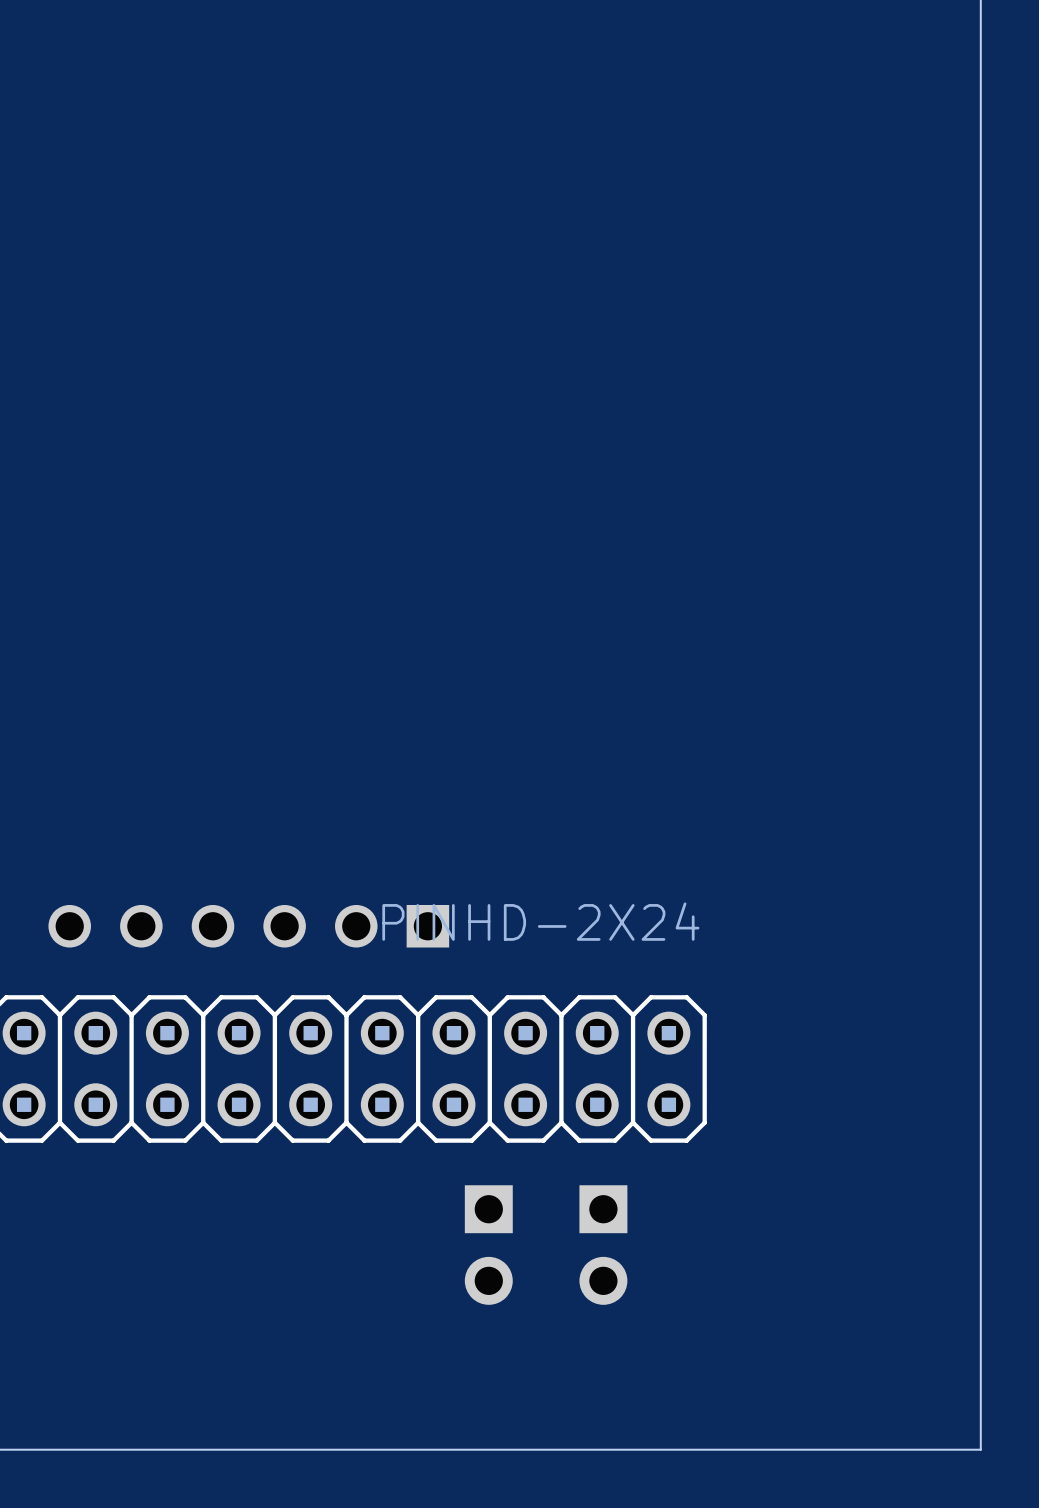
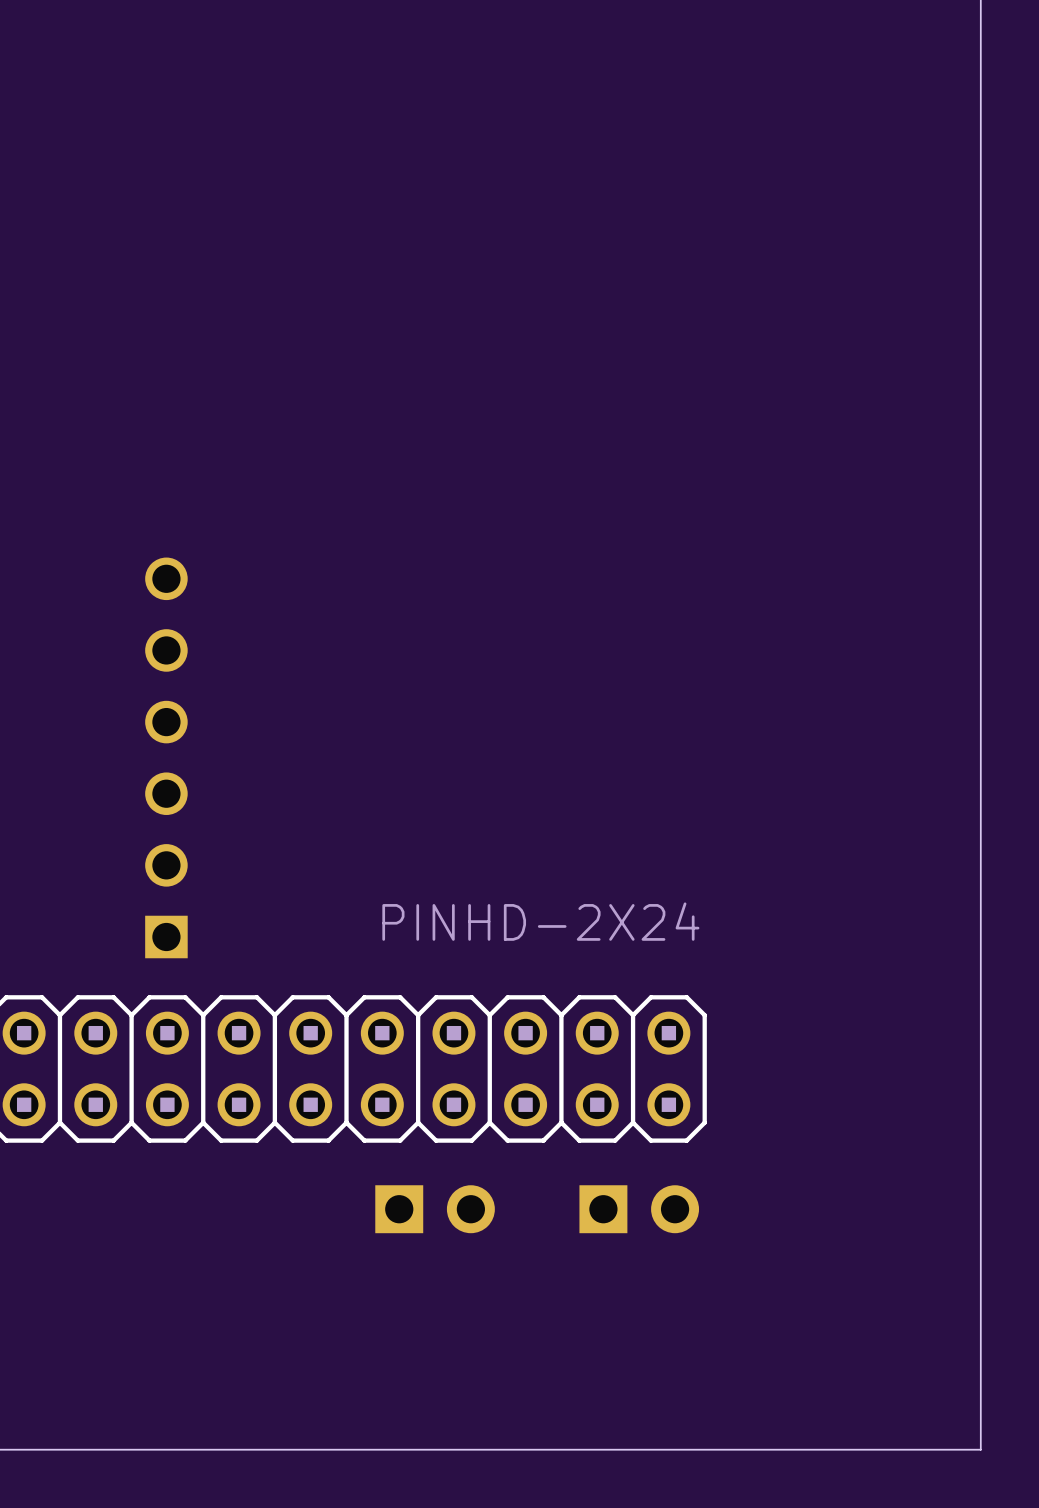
part rotation: 0° (248, 926) -> 90° clockwise (166, 757)
part rotation: 0° (488, 1245) -> 90° counterclockwise (435, 1209)
part rotation: 0° (603, 1245) -> 90° counterclockwise (639, 1209)

